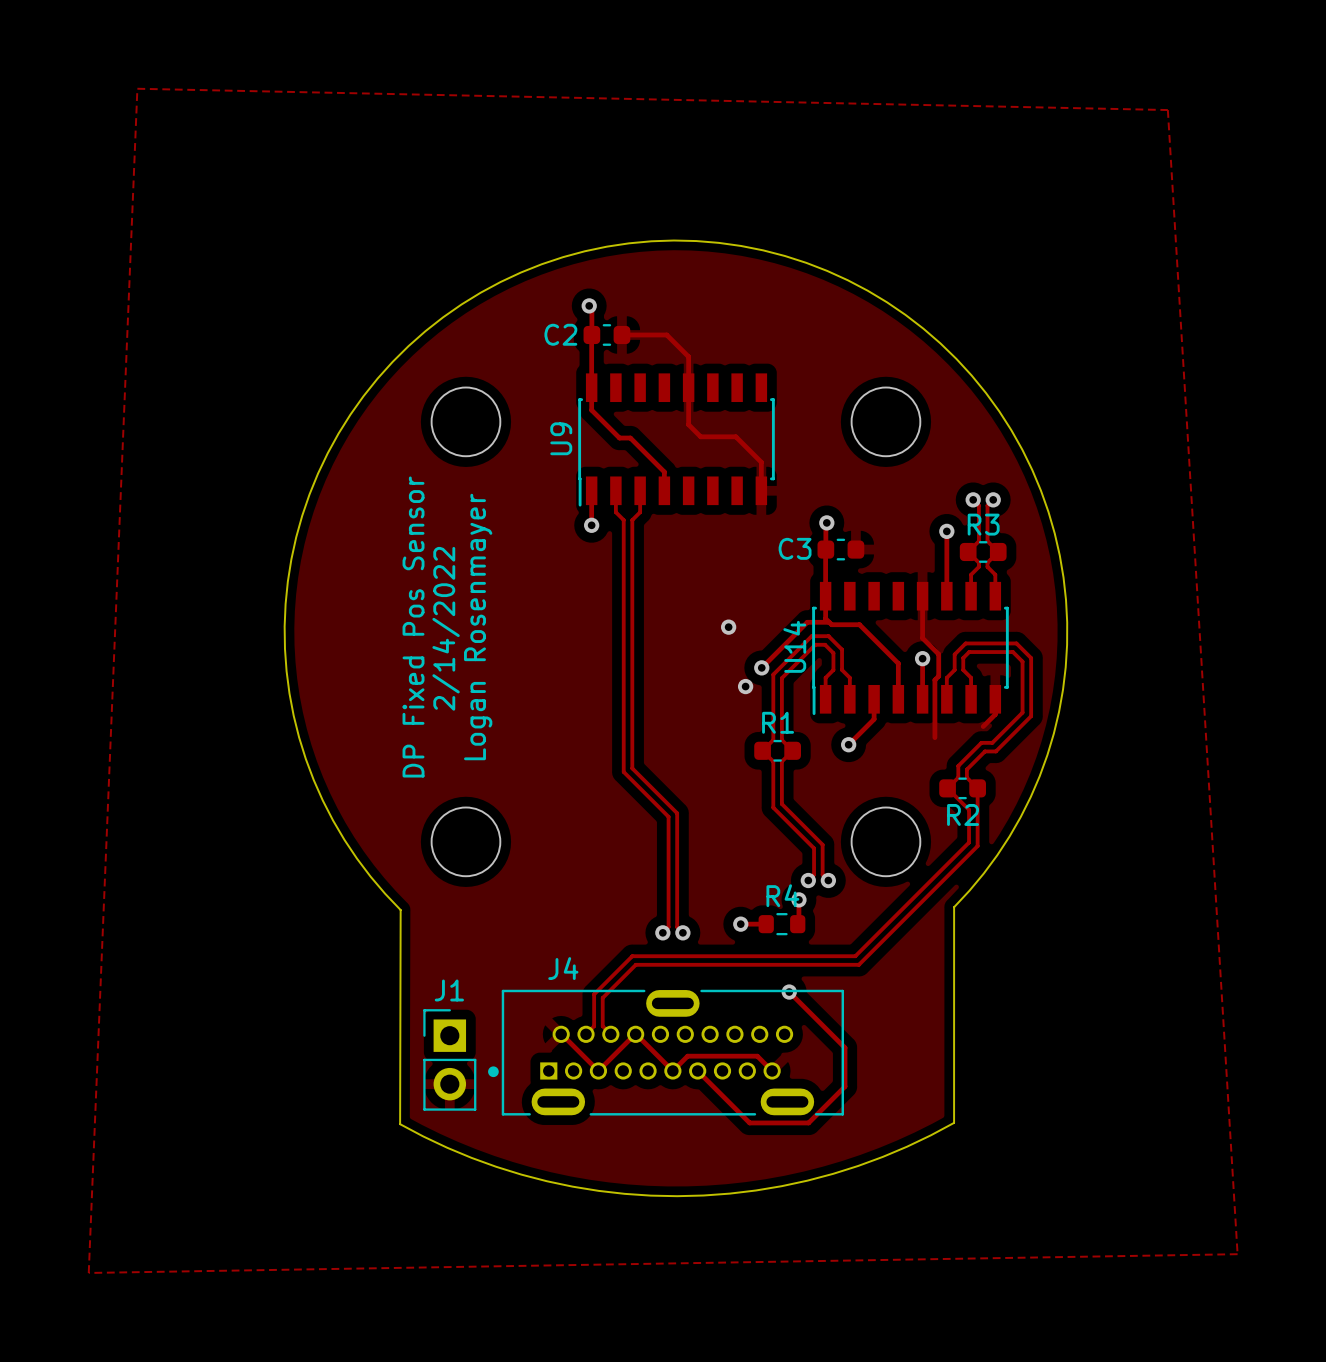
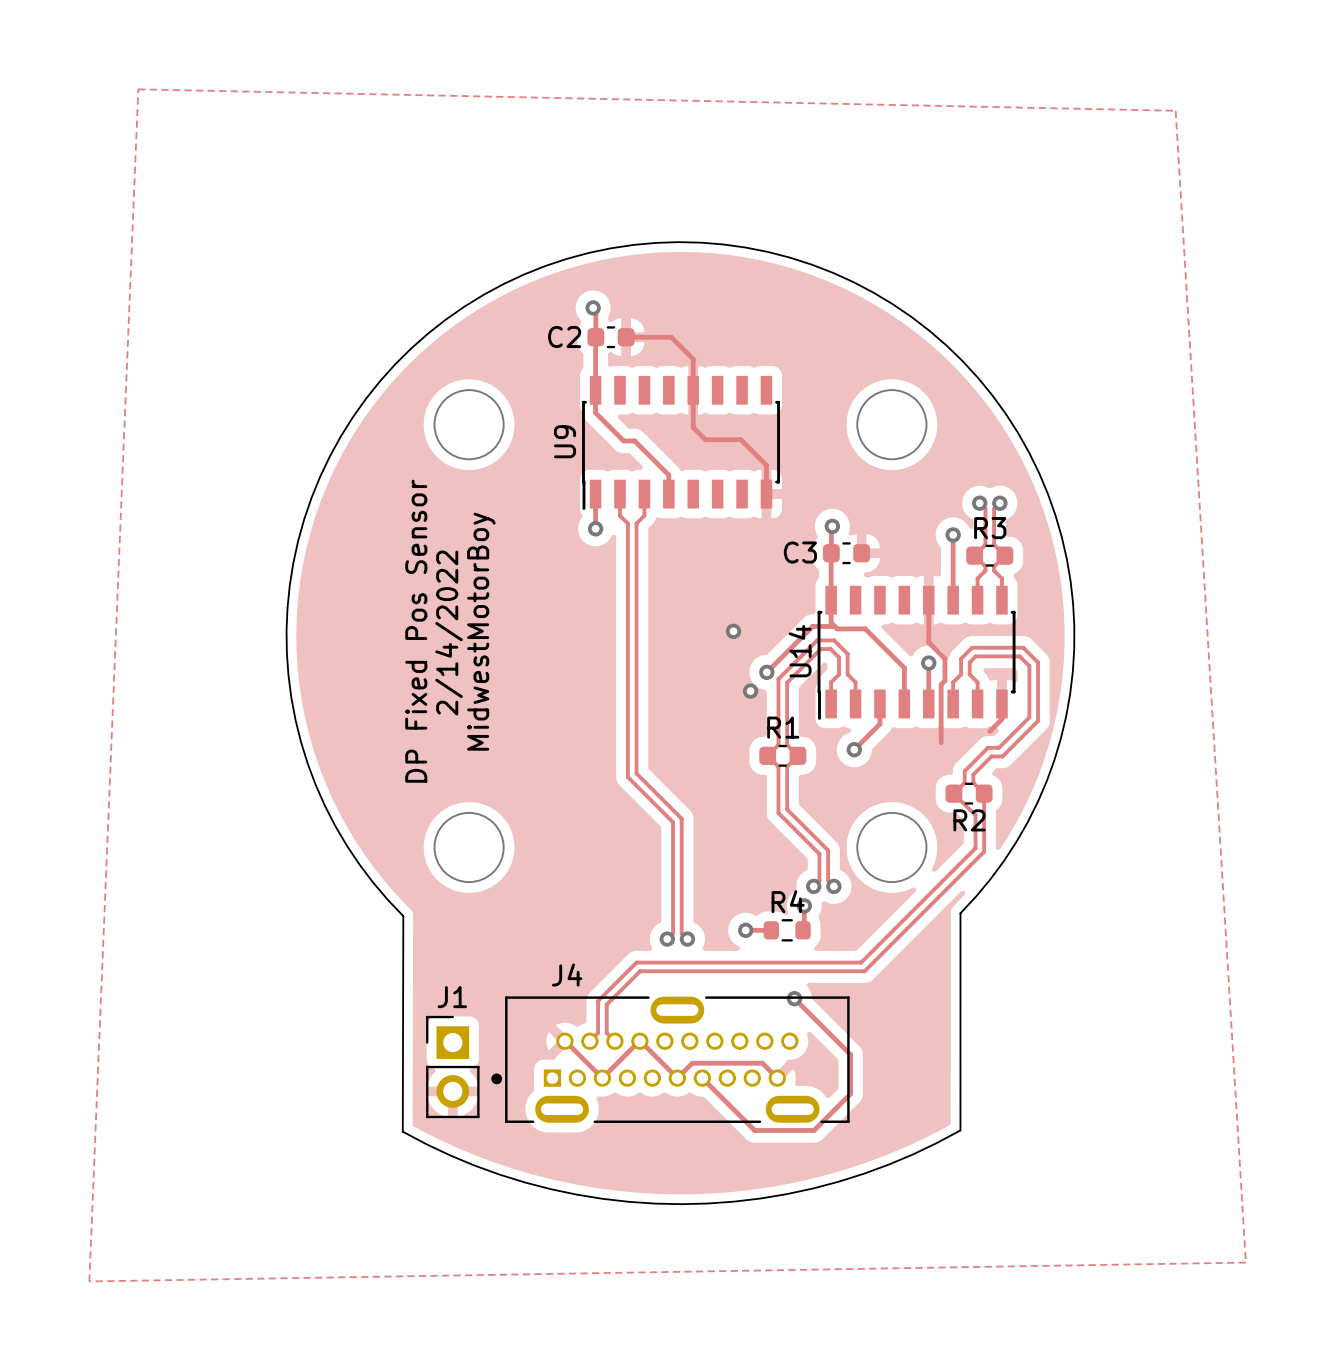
text: Logan Rosenmayer (478, 626) -> MidwestMotorBoy (481, 631)

